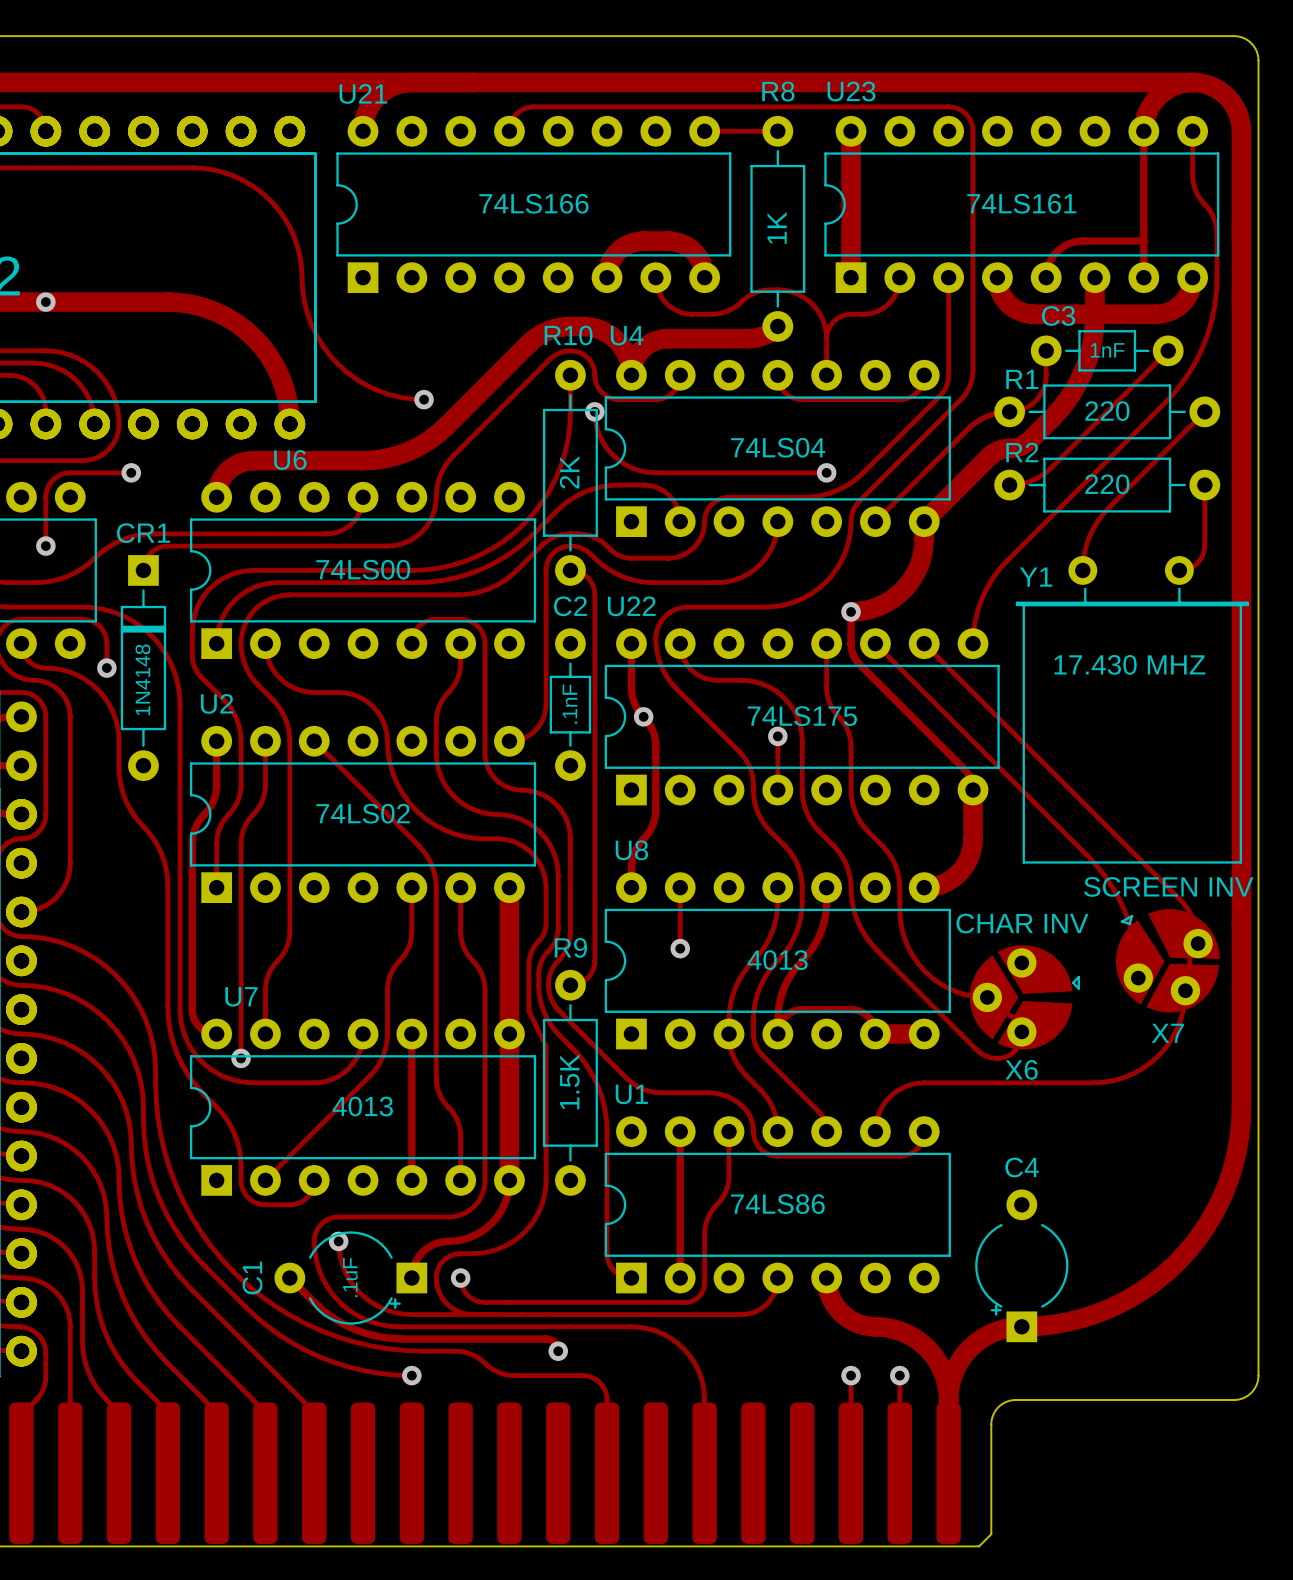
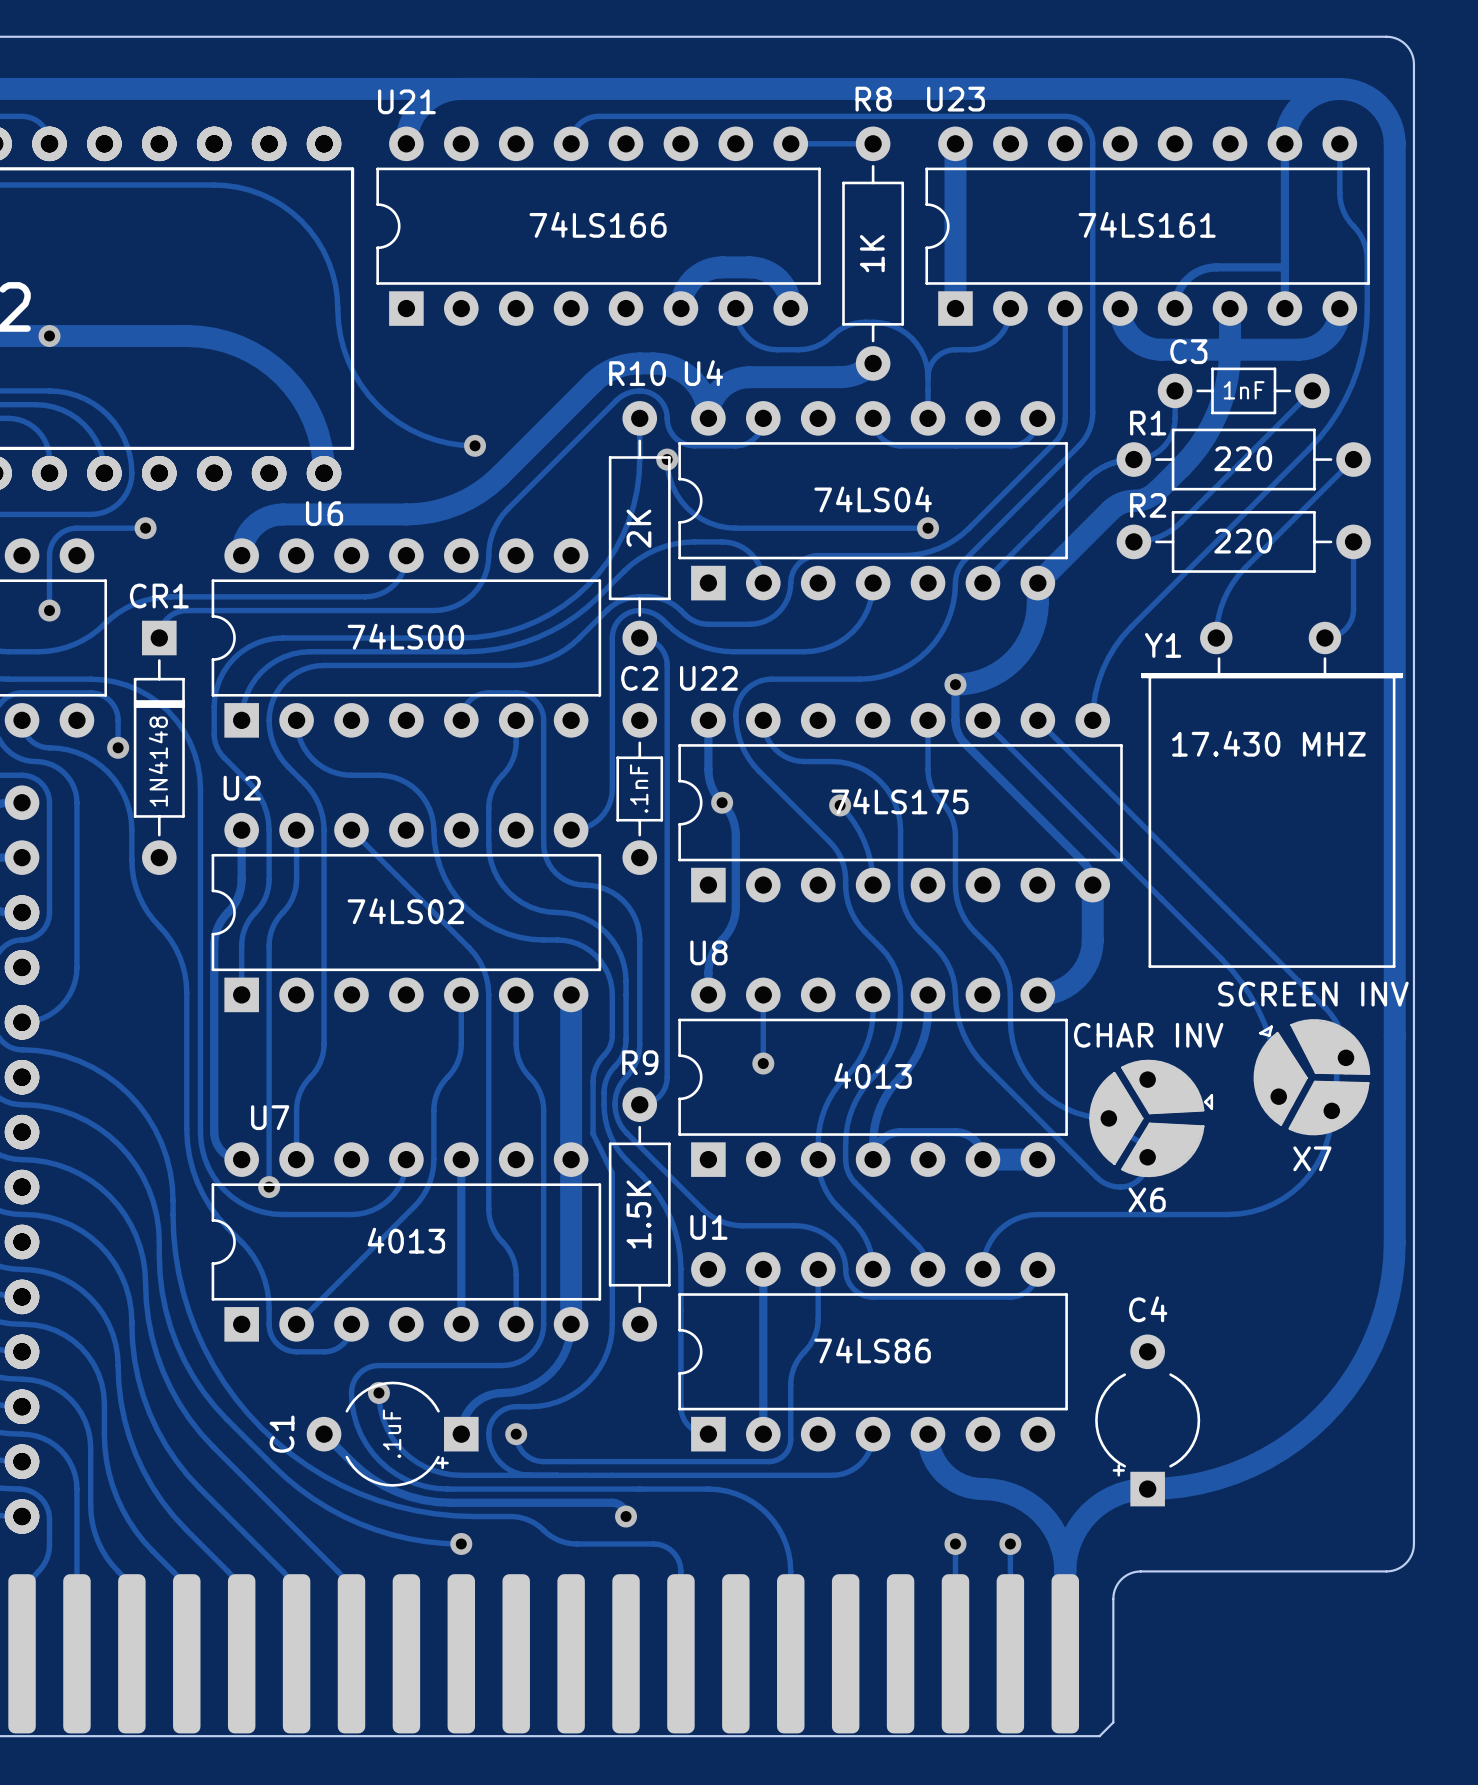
track: (777, 736) (777, 789) -> (840, 805) (854, 822) (864, 841) (870, 863) (873, 885)
via position: (777, 736) -> (840, 805)

